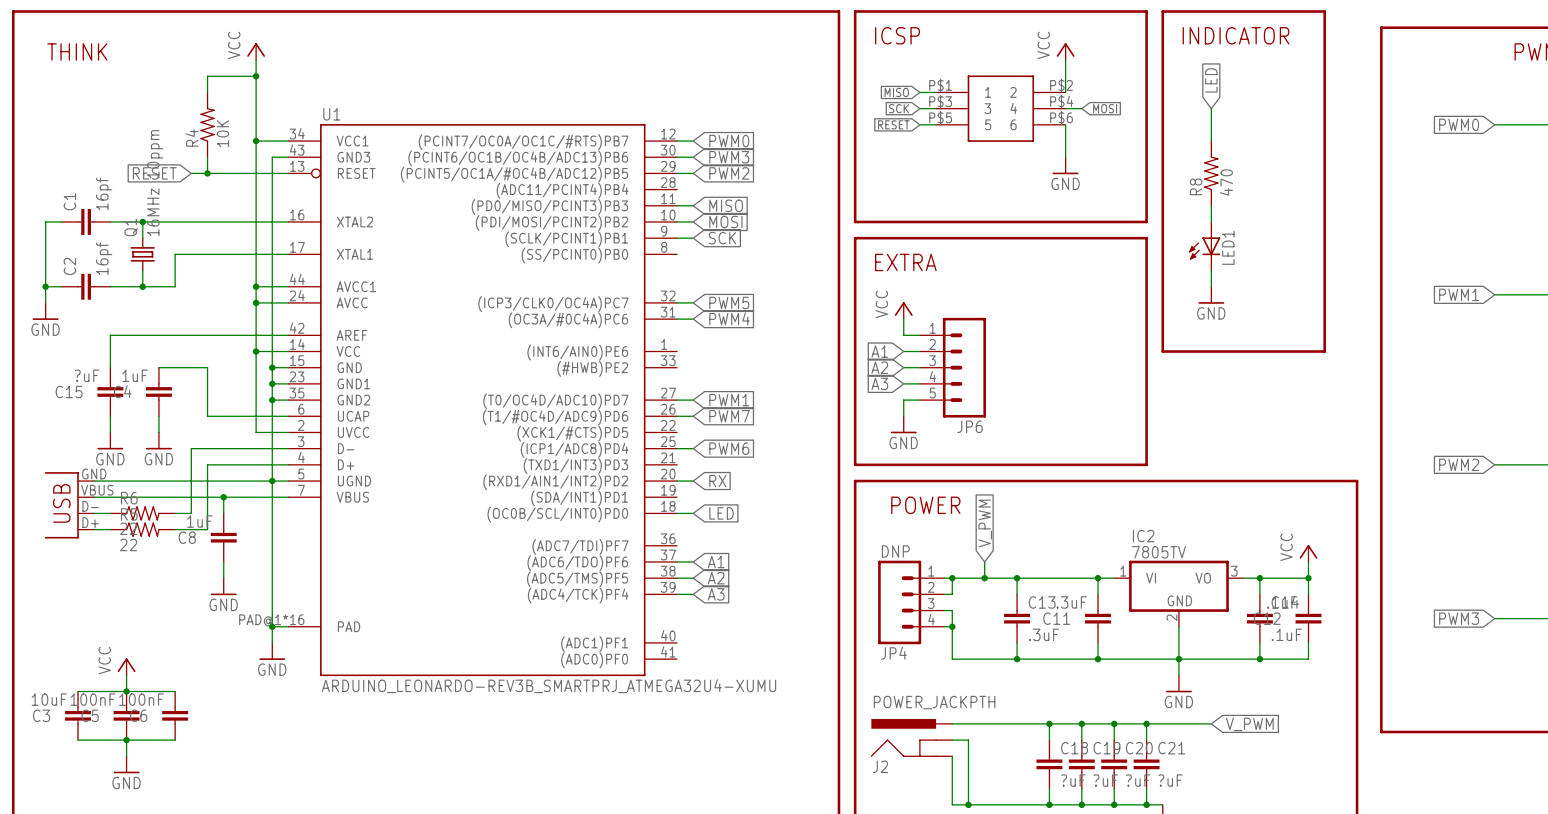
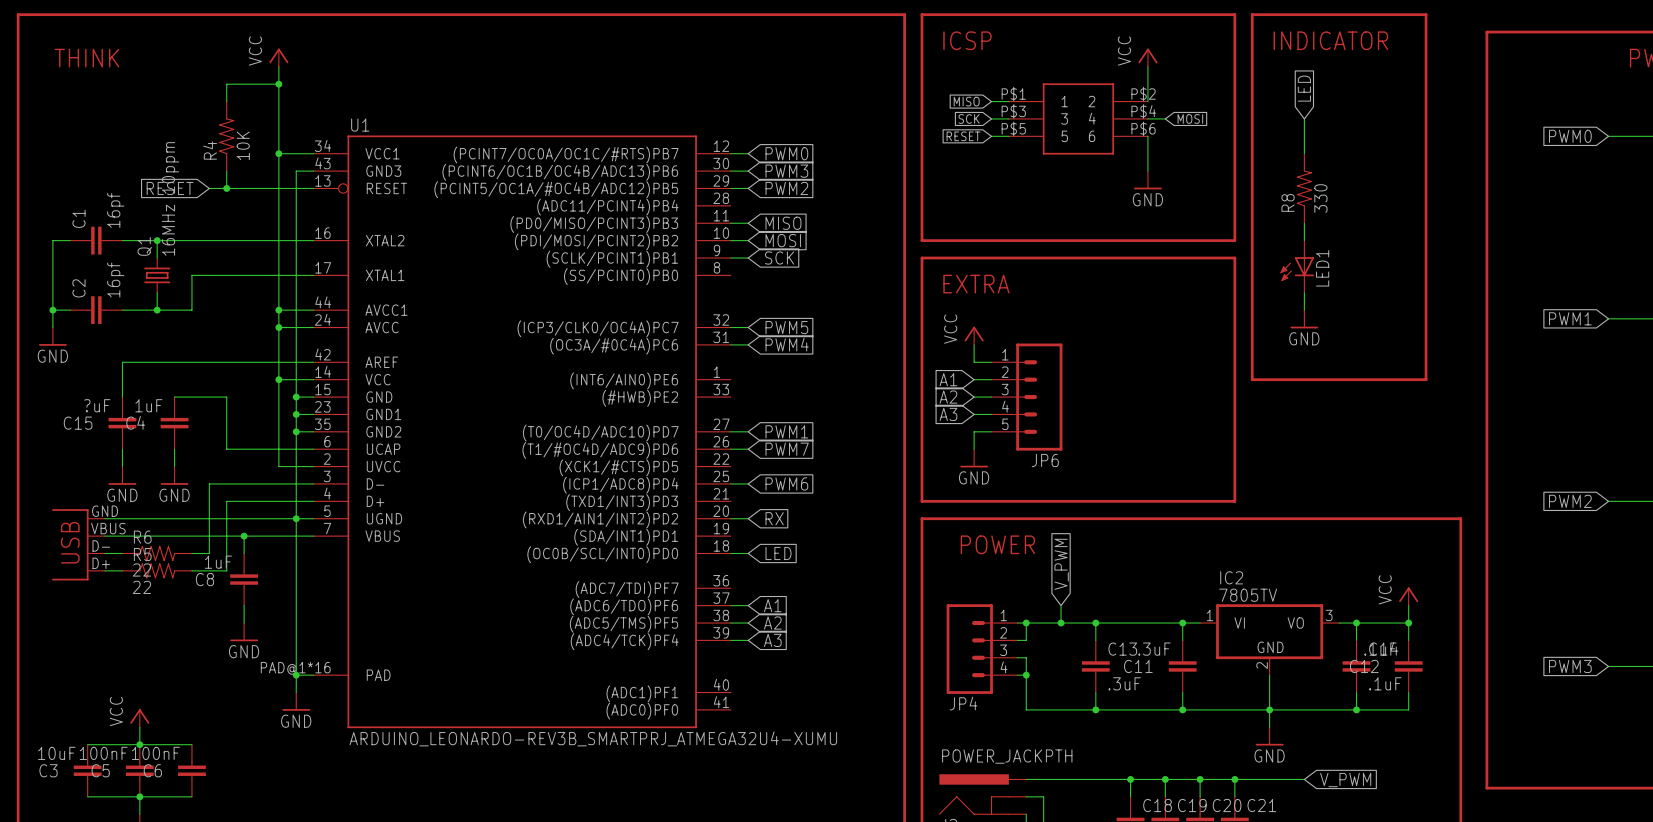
R8 value: 470 (1226, 182) -> 330 (1320, 198)
JP4 value: DNP (895, 551) -> none

